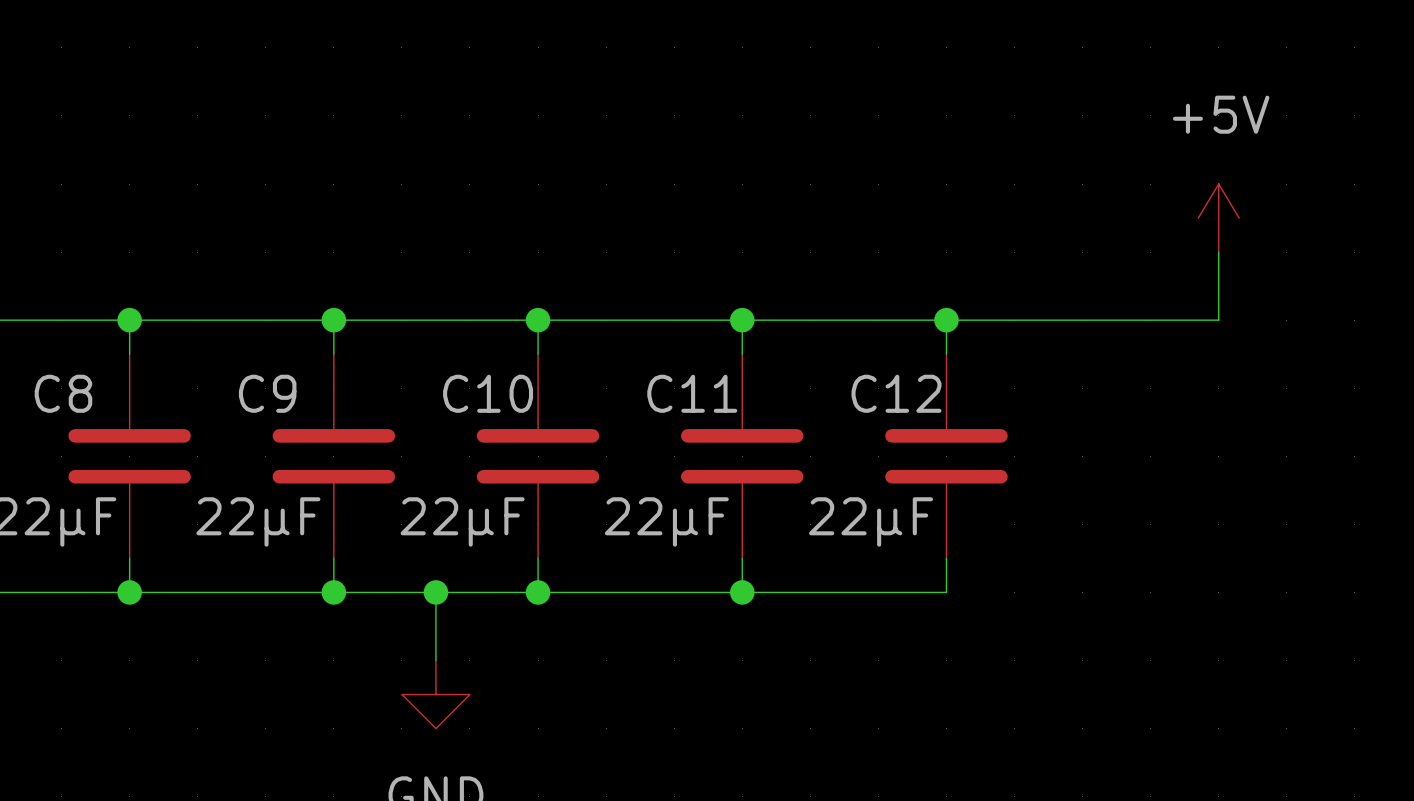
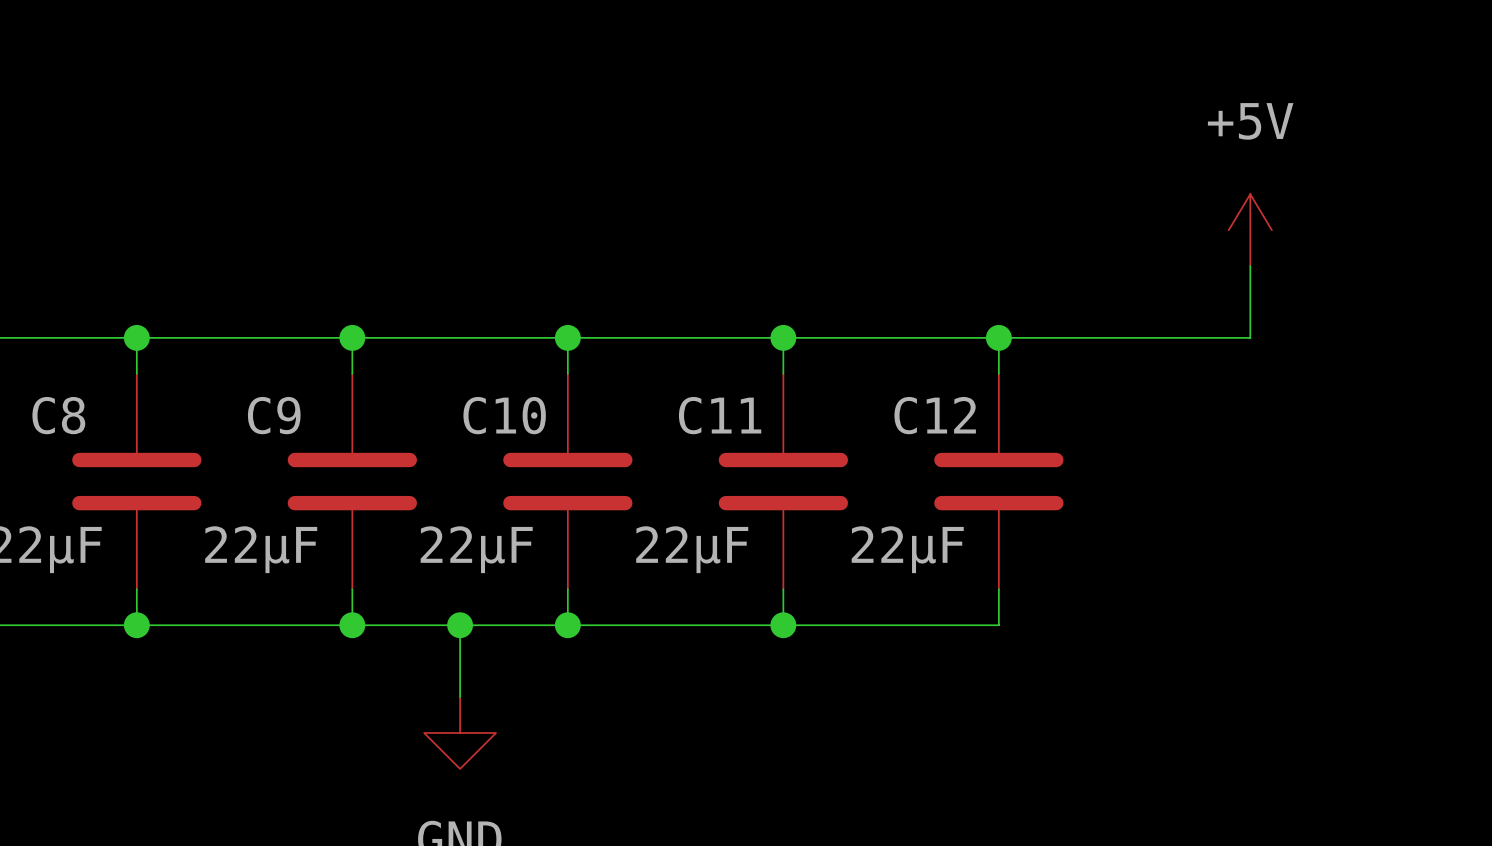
power symbol position: +5V (1218, 218) -> +5V (1250, 230)
wire: (1218, 252) (1218, 320) (1184, 320) -> (1250, 266) (1250, 337)

